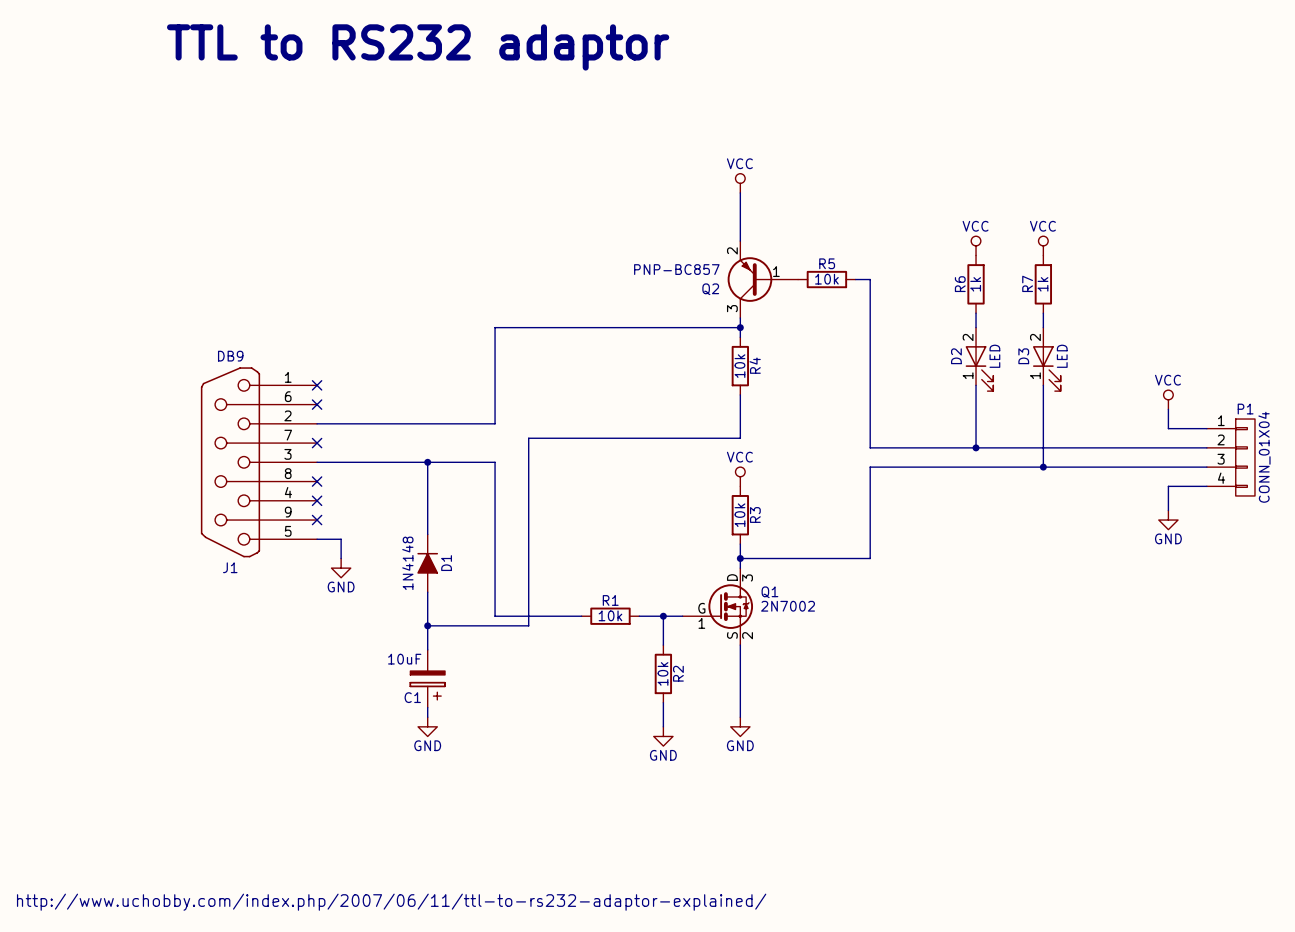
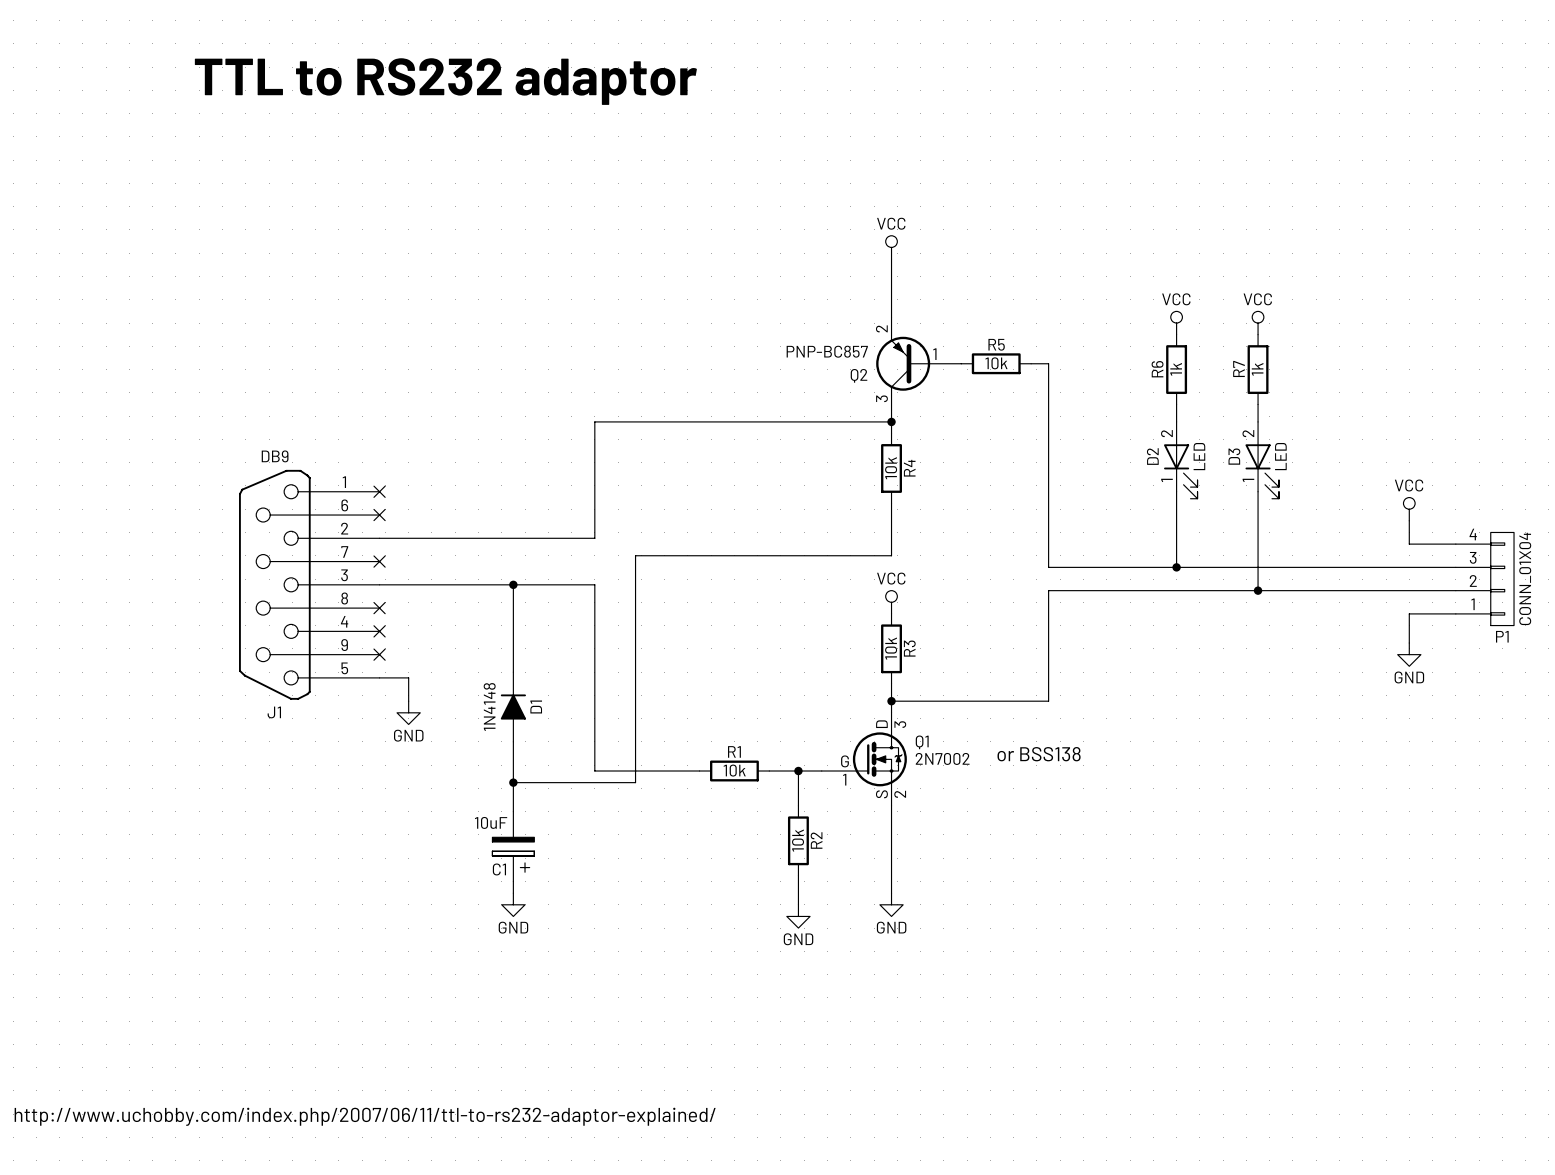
P1 flip: as is (1245, 457) -> up-down (1502, 579)
text: none -> or BSS138 (1039, 754)

